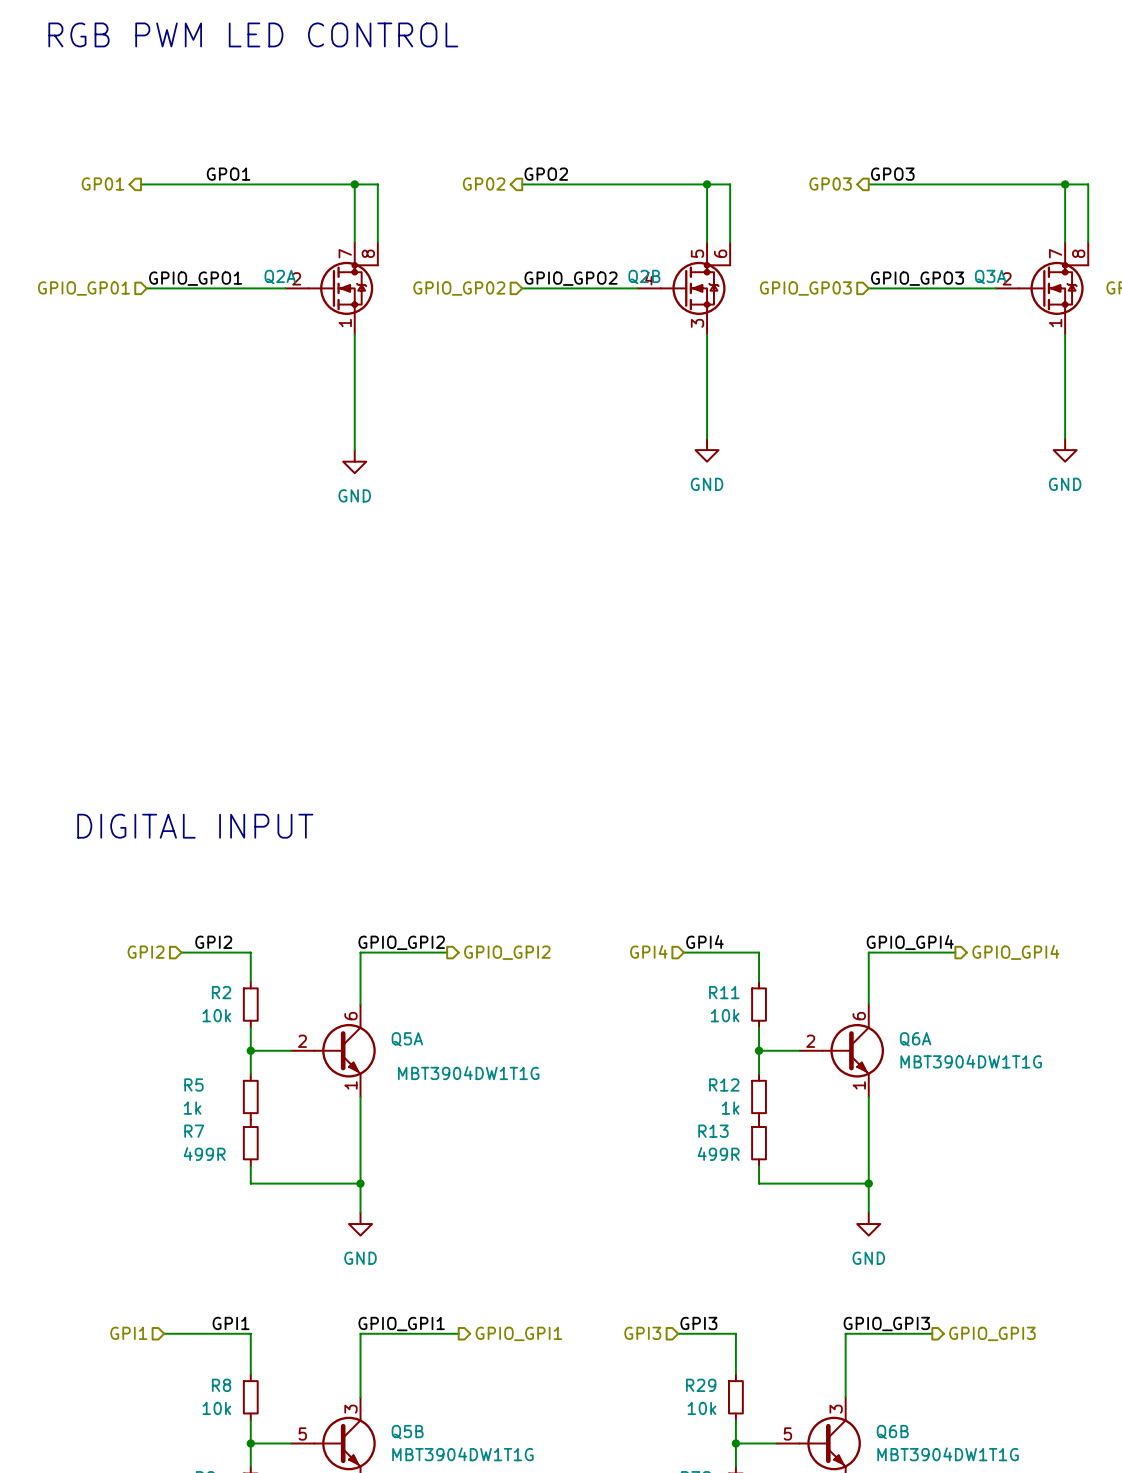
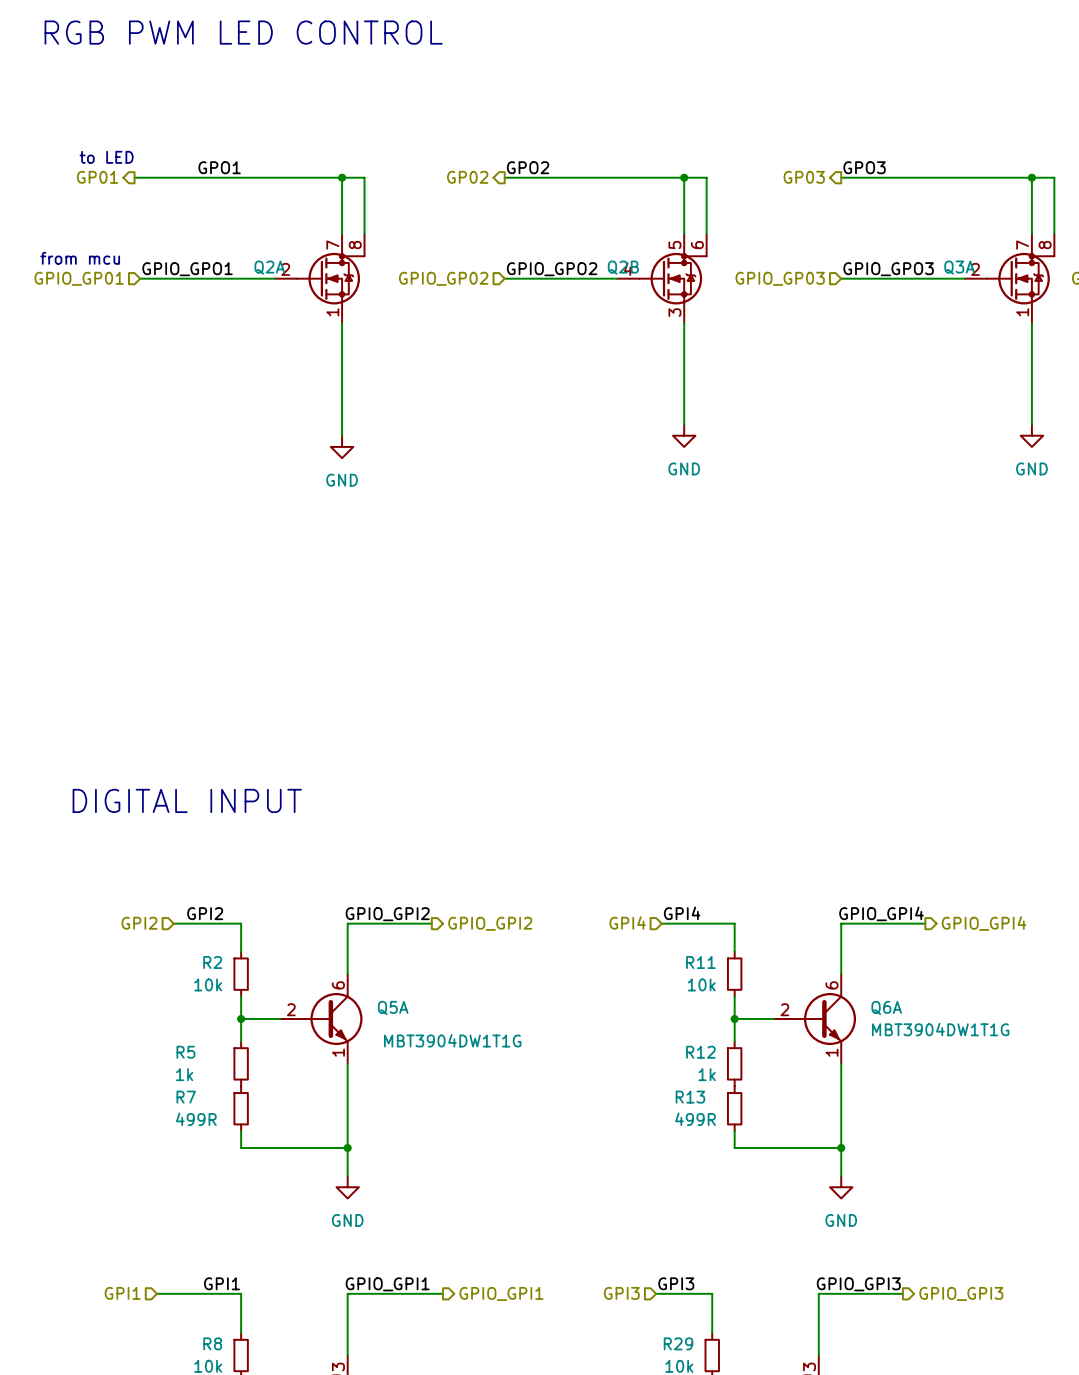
text: none -> to LED (106, 157)
text: none -> from mcu (80, 258)

